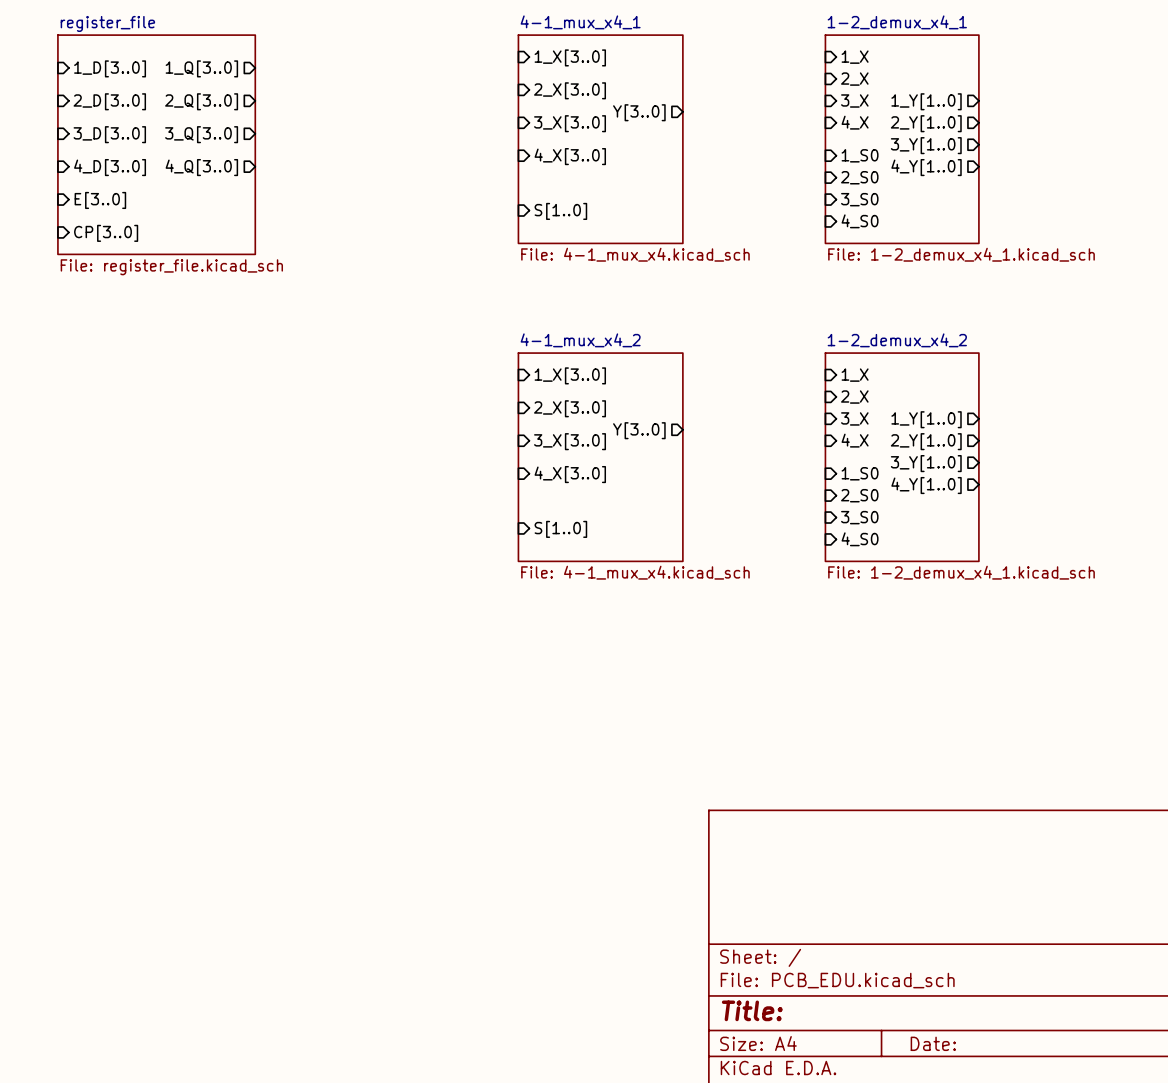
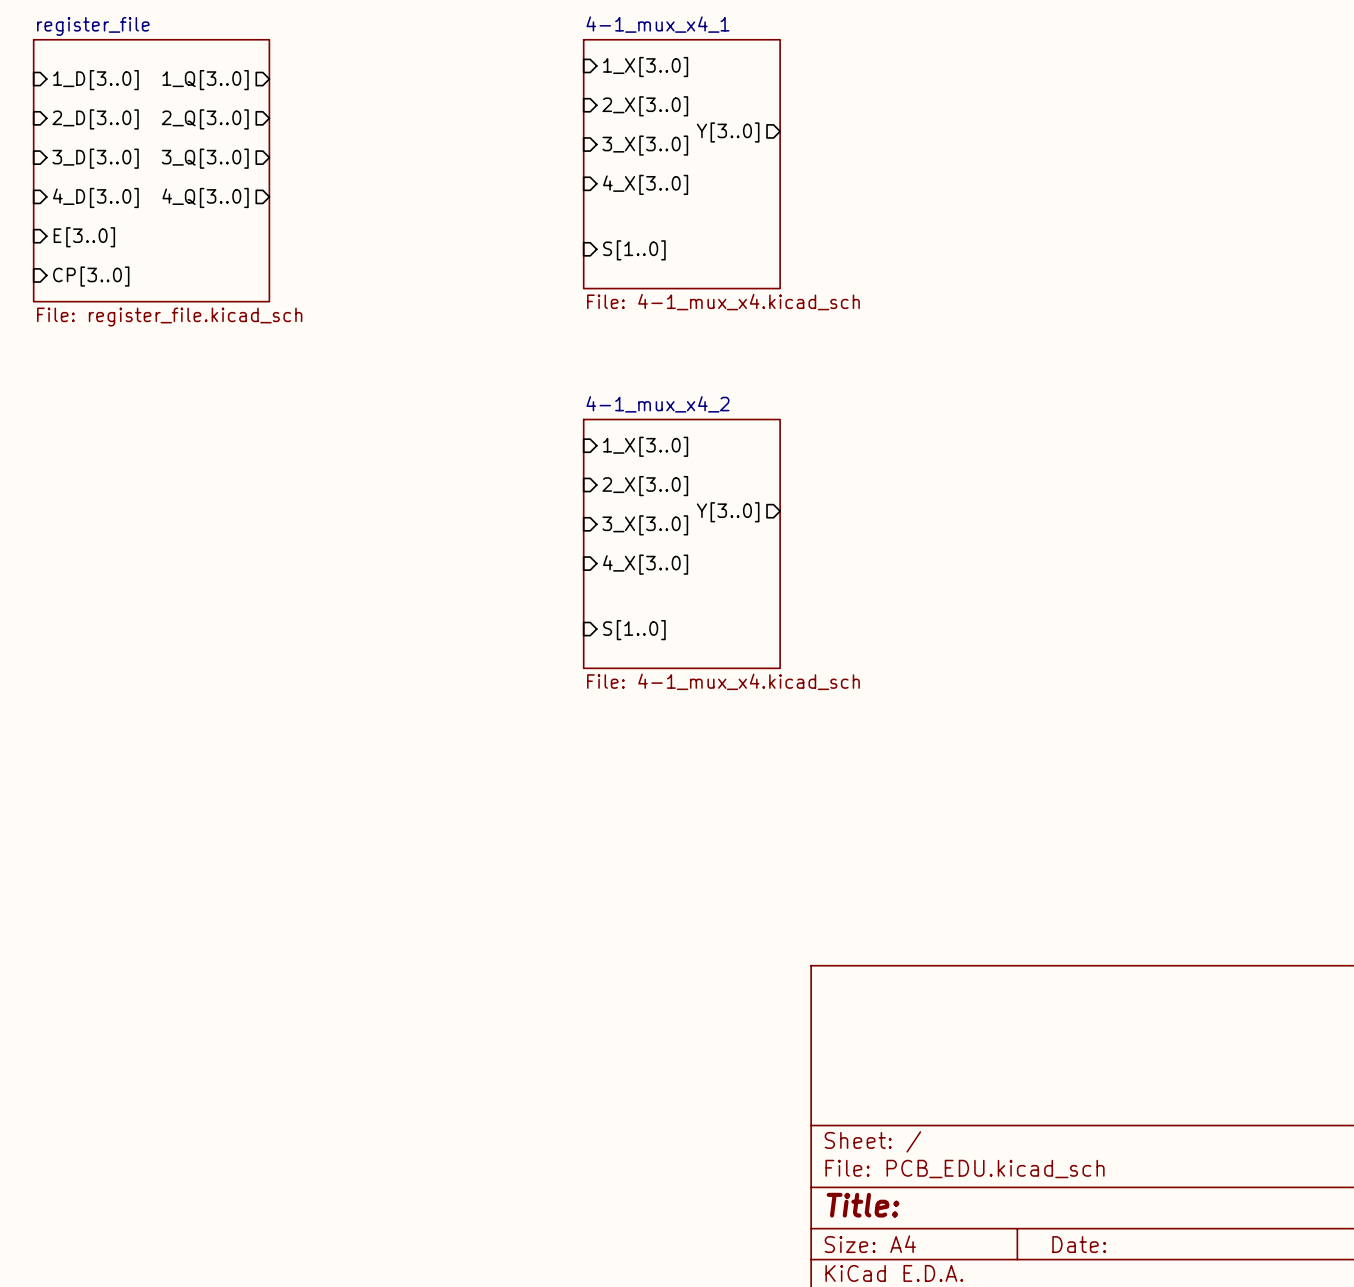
sheet pin: 1_X (855, 57) -> none
sheet pin: 2_X (854, 79) -> none
sheet pin: 3_X (854, 101) -> none
sheet pin: 1_Y[1..0] (926, 101) -> none
sheet pin: 4_X (855, 122) -> none
sheet pin: 2_Y[1..0] (926, 123) -> none
sheet 1-2_demux_x4_1: File: 1-2_demux_x4_1.kicad_sch (902, 139) -> none
sheet pin: 3_Y[1..0] (926, 145) -> none
sheet pin: 1_S0 (860, 155) -> none
sheet pin: 4_Y[1..0] (926, 167) -> none
sheet pin: 2_S0 (859, 177) -> none
sheet pin: 3_S0 (859, 199) -> none
sheet pin: 4_S0 (860, 221) -> none
sheet pin: 1_X (855, 375) -> none
sheet pin: 2_X (854, 397) -> none
sheet pin: 3_X (854, 418) -> none
sheet pin: 1_Y[1..0] (926, 419) -> none
sheet pin: 4_X (855, 440) -> none
sheet pin: 2_Y[1..0] (926, 441) -> none
sheet 1-2_demux_x4_2: File: 1-2_demux_x4_1.kicad_sch (902, 457) -> none
sheet pin: 3_Y[1..0] (926, 463) -> none
sheet pin: 1_S0 (860, 473) -> none
sheet pin: 4_Y[1..0] (926, 485) -> none
sheet pin: 2_S0 (859, 495) -> none
sheet pin: 3_S0 (859, 517) -> none
sheet pin: 4_S0 (860, 539) -> none

